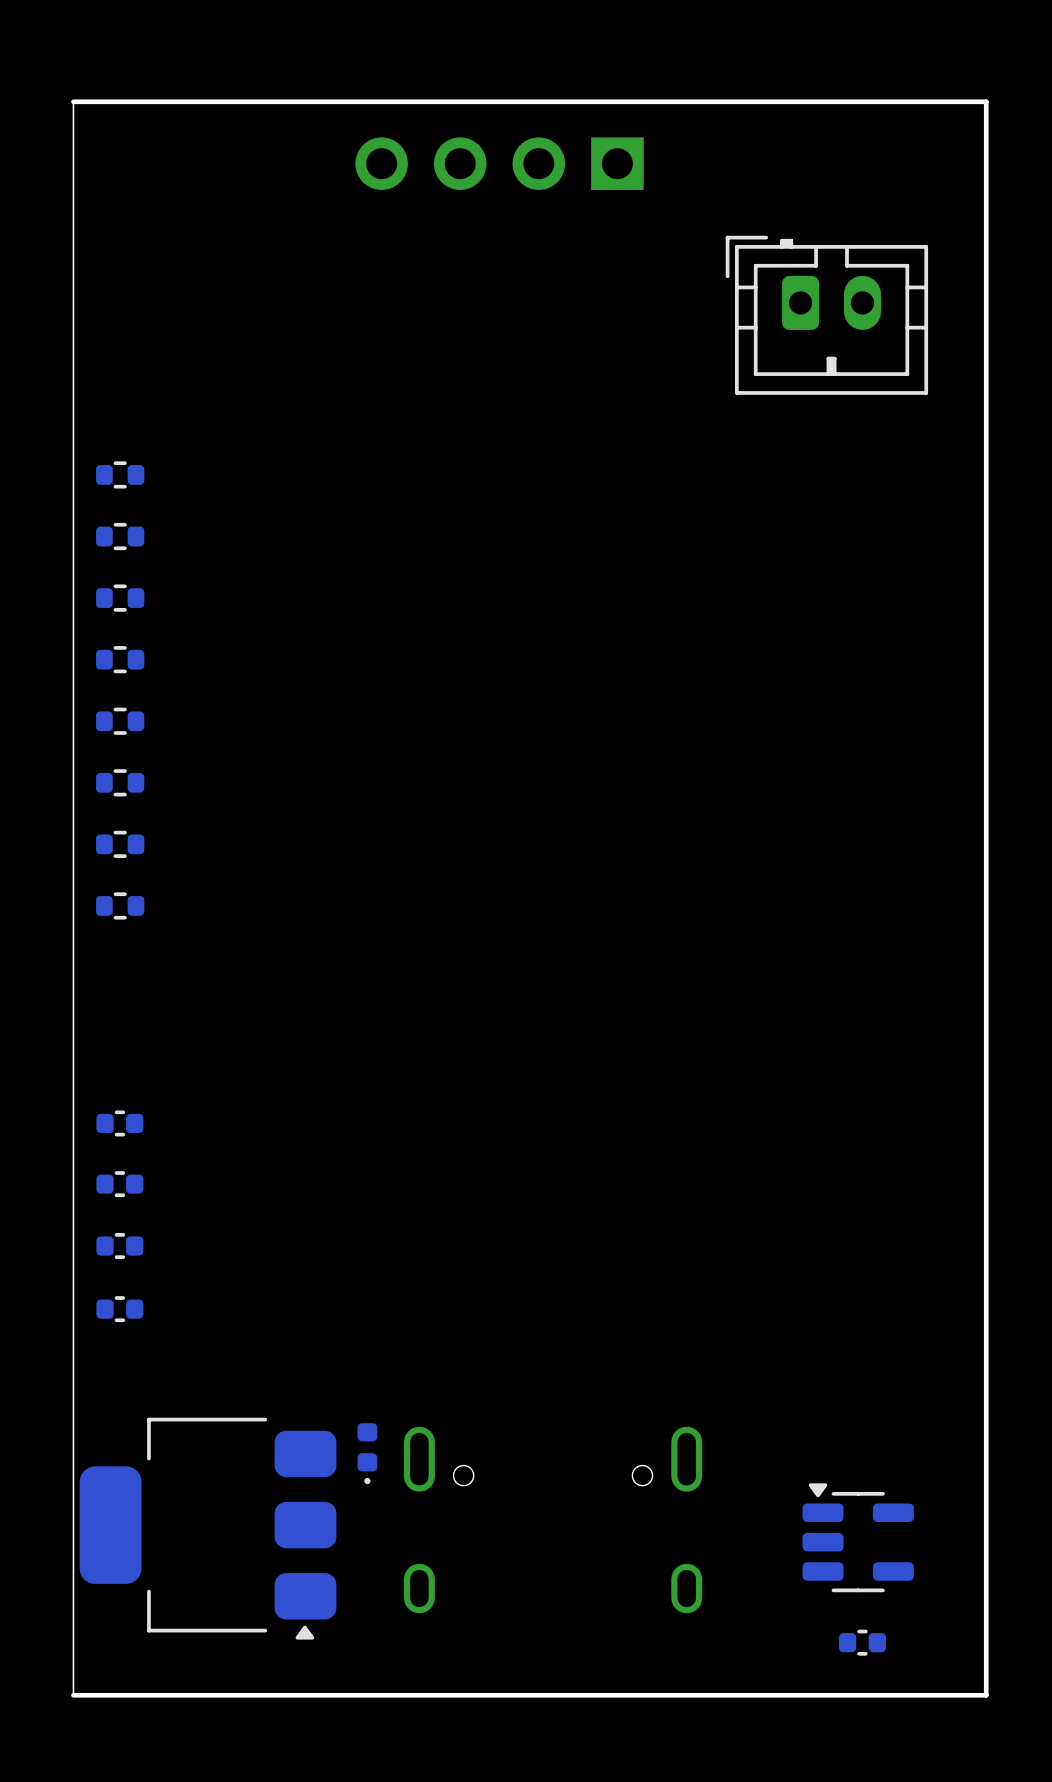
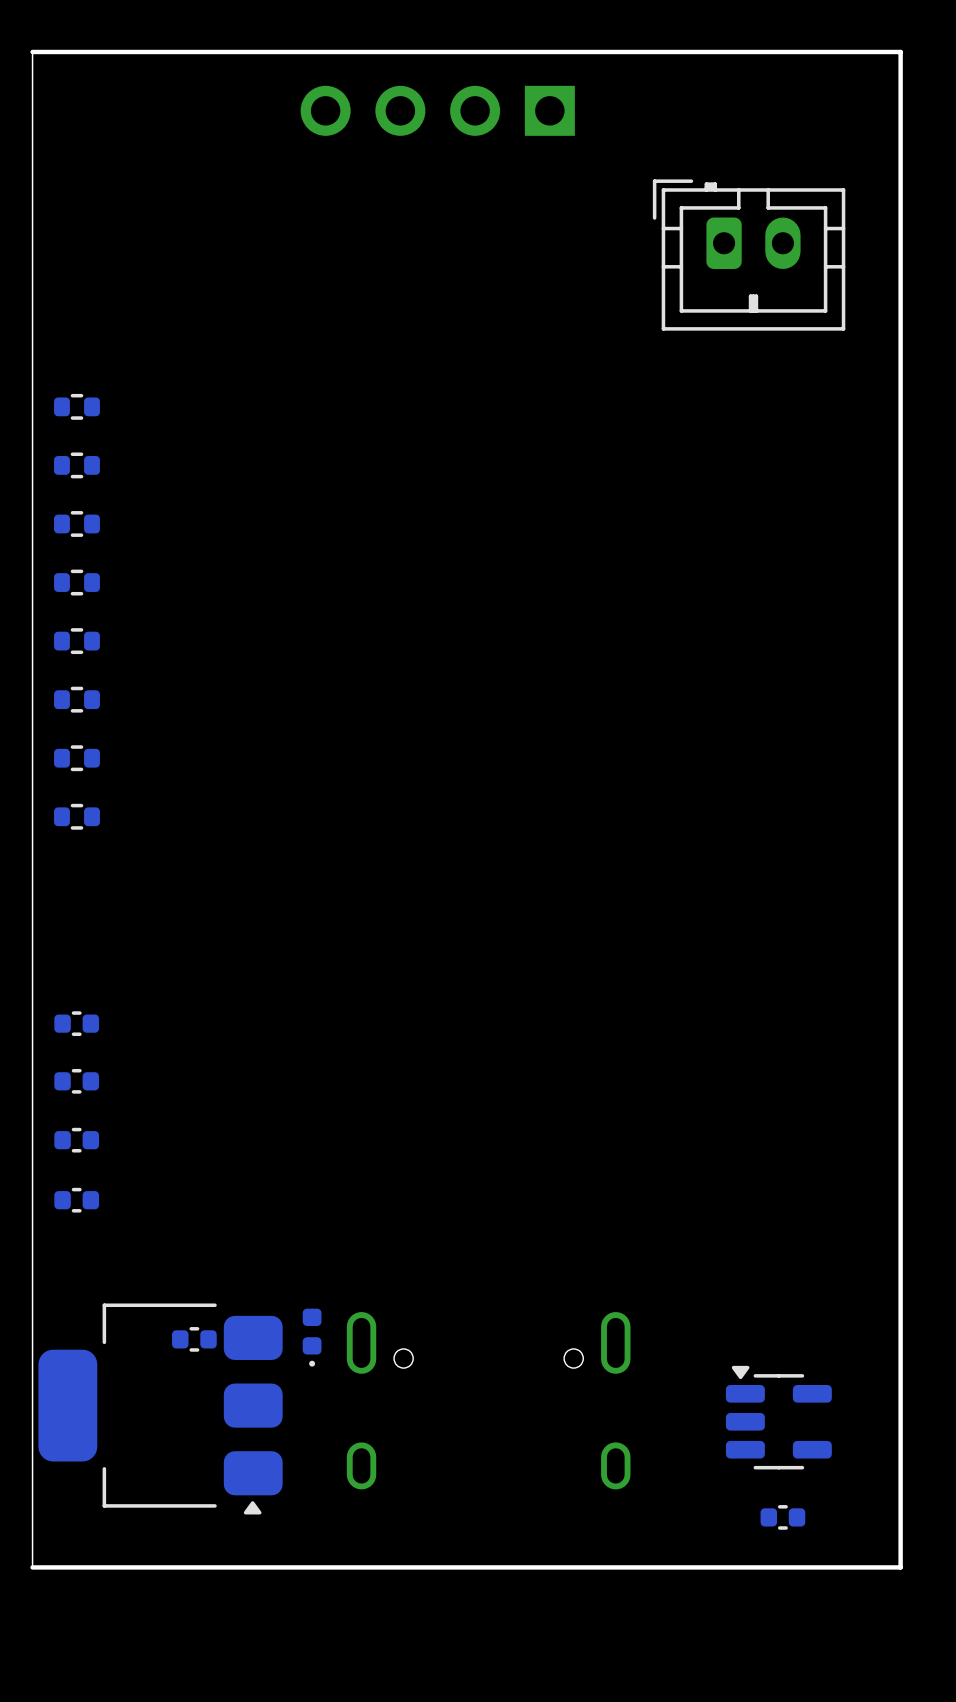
part: none -> (194, 1339)

